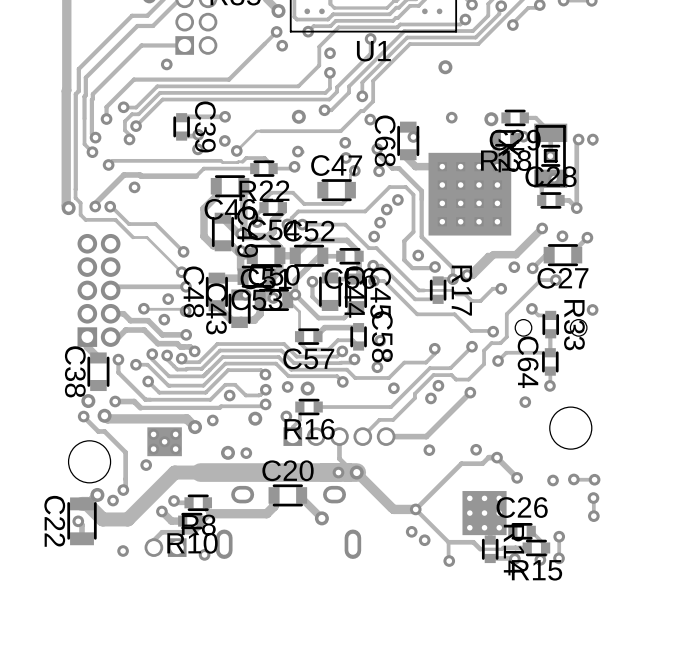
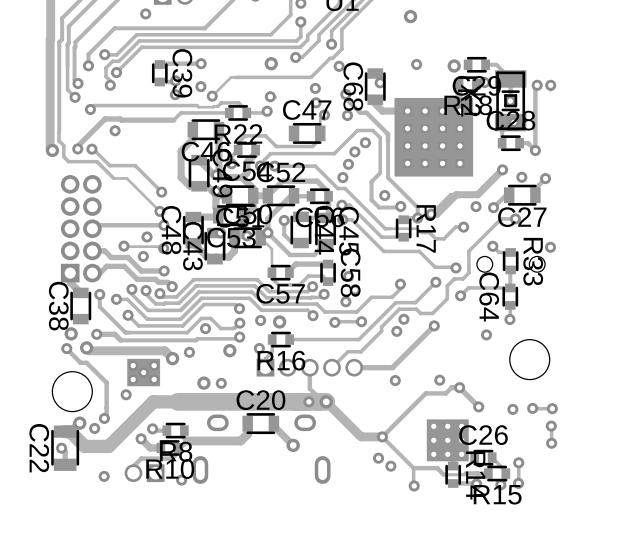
track: none -> (361, 321) (334, 322)
via: none -> (334, 322)

